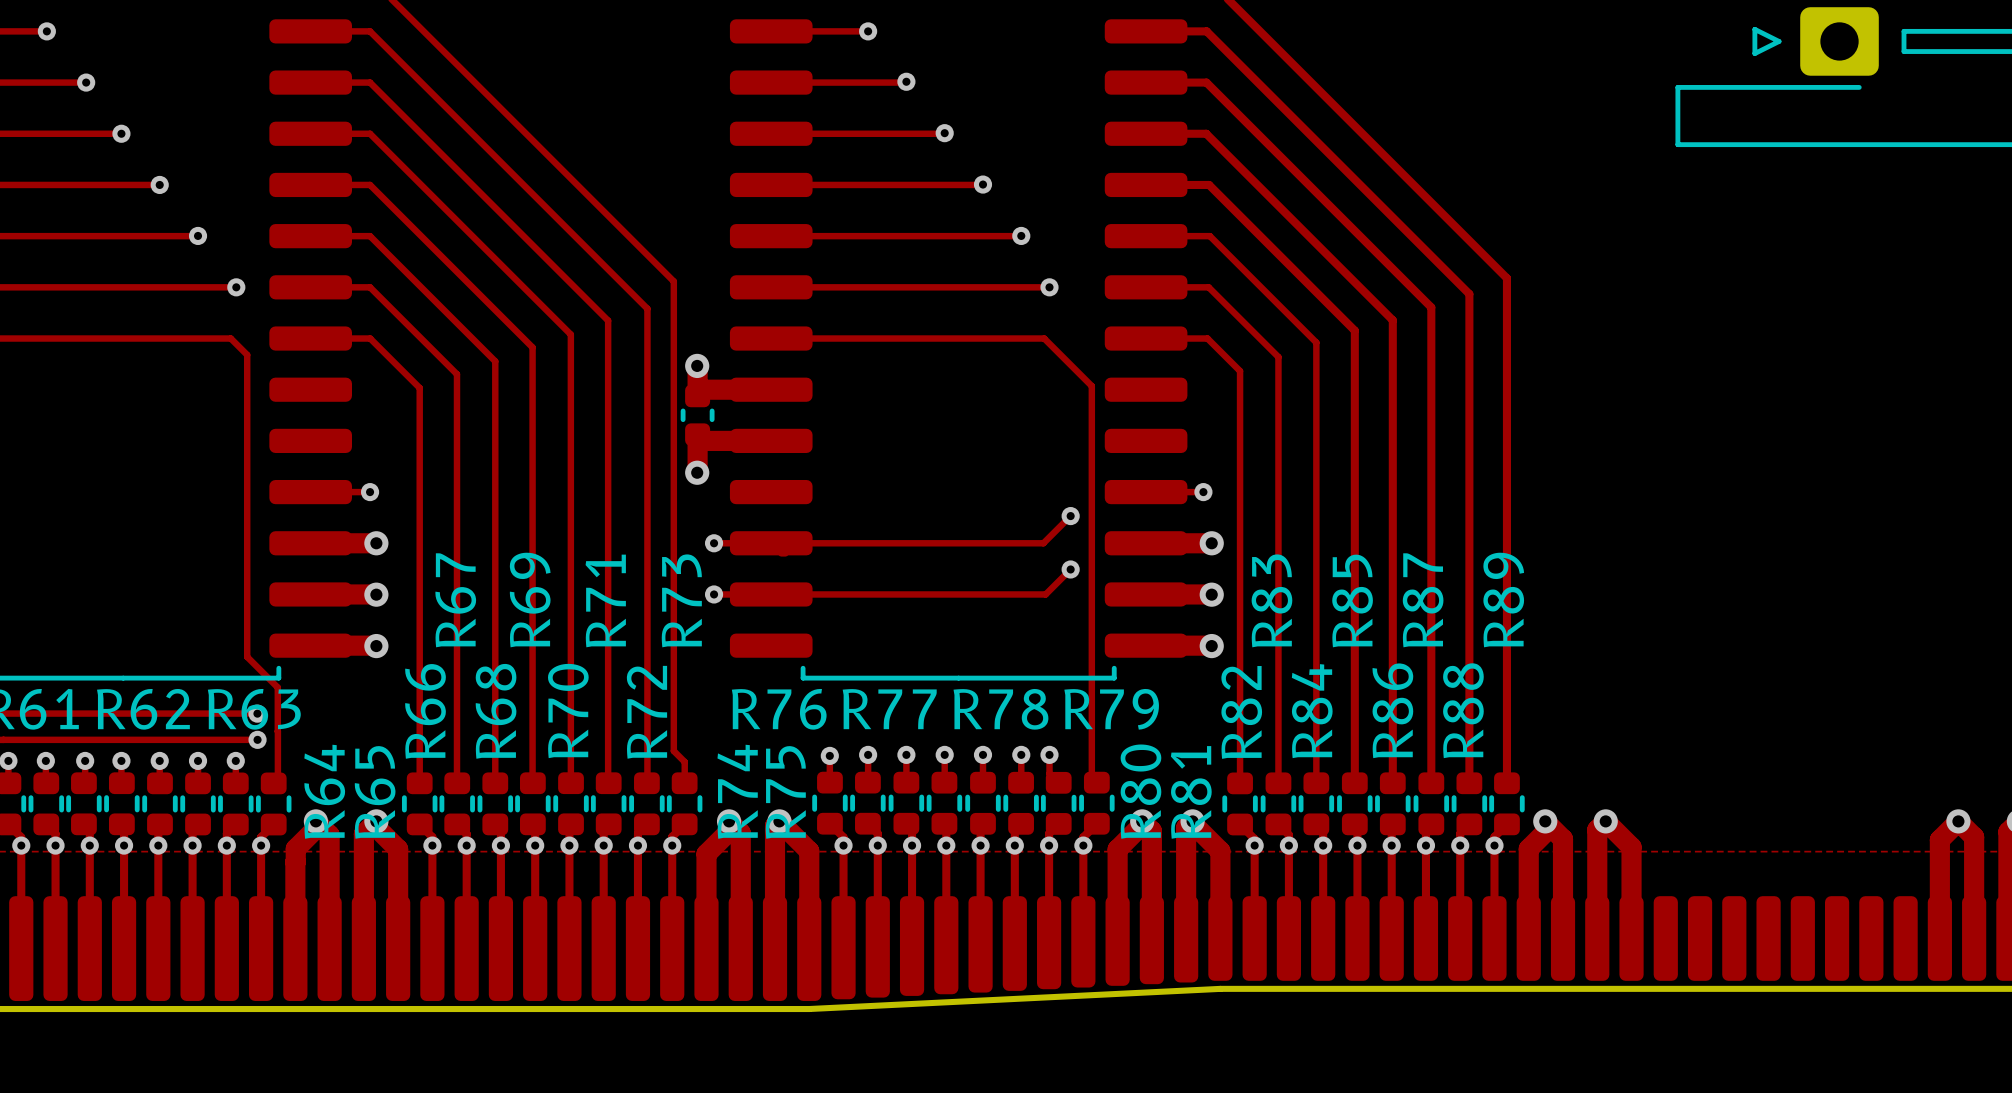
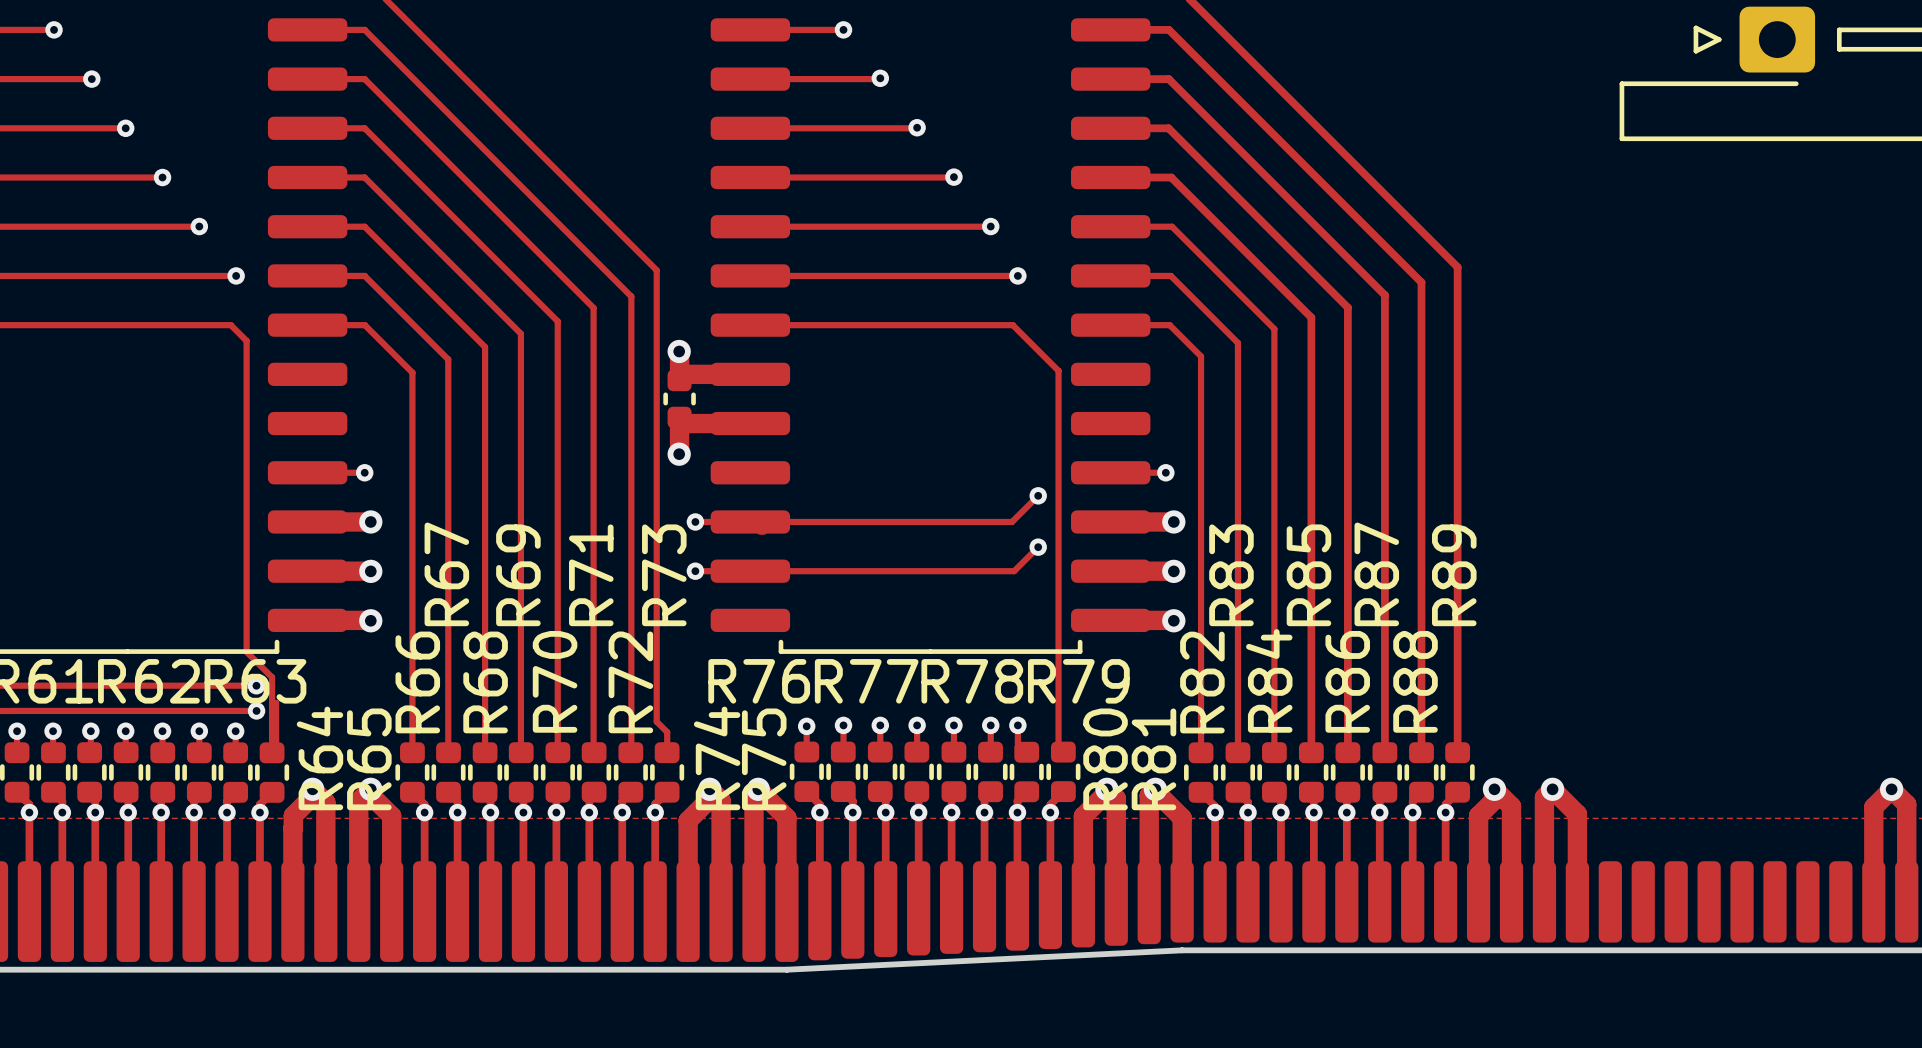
track: (247, 656) (277, 687) (277, 731) -> (246, 631) (246, 651) (272, 677) (272, 752)

